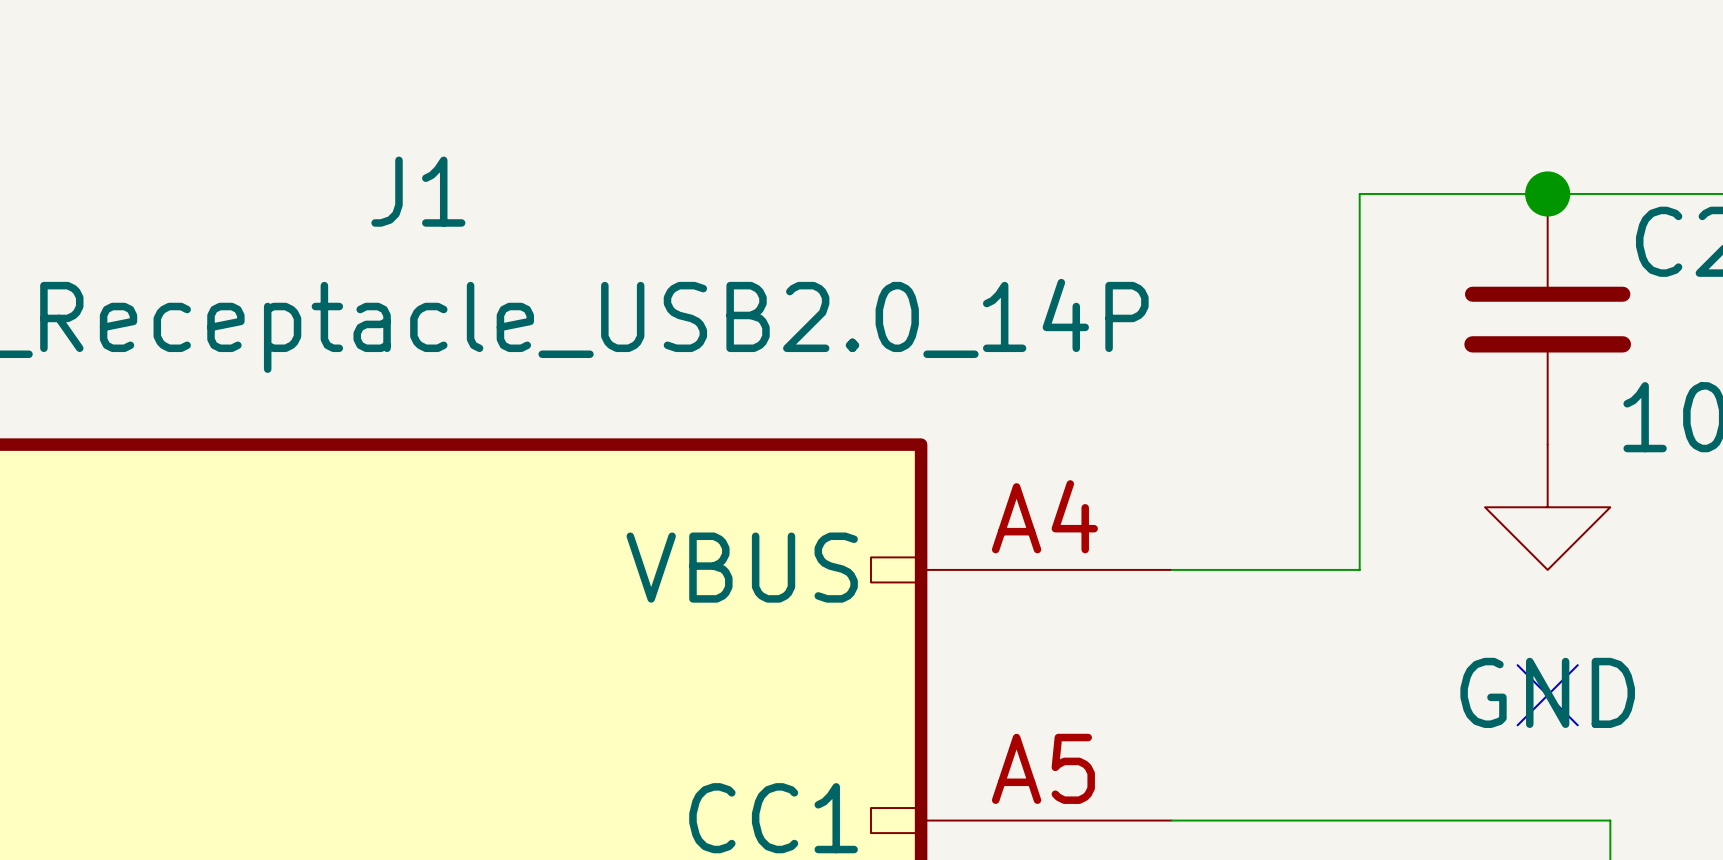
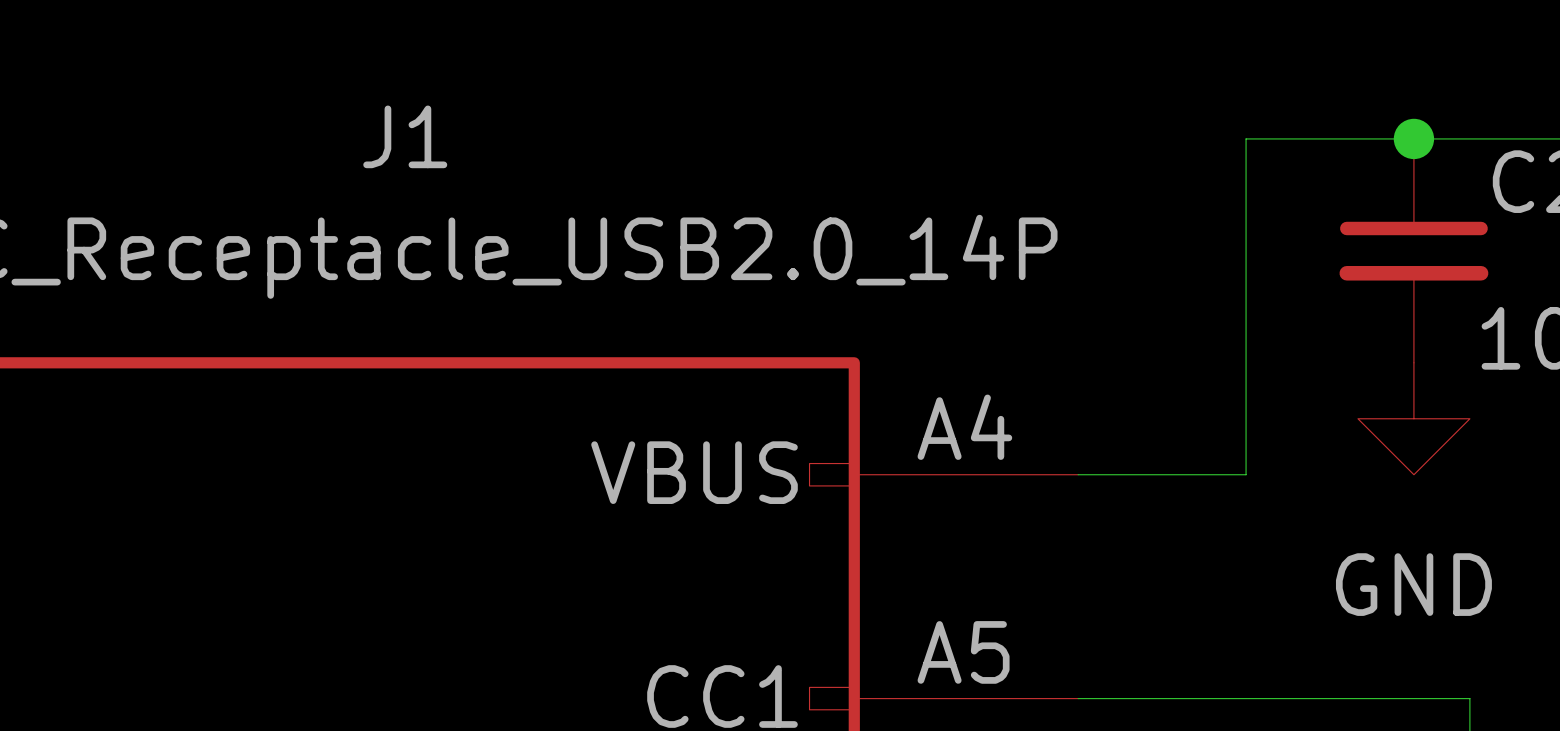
no-connect mark: (1547, 695) -> none

